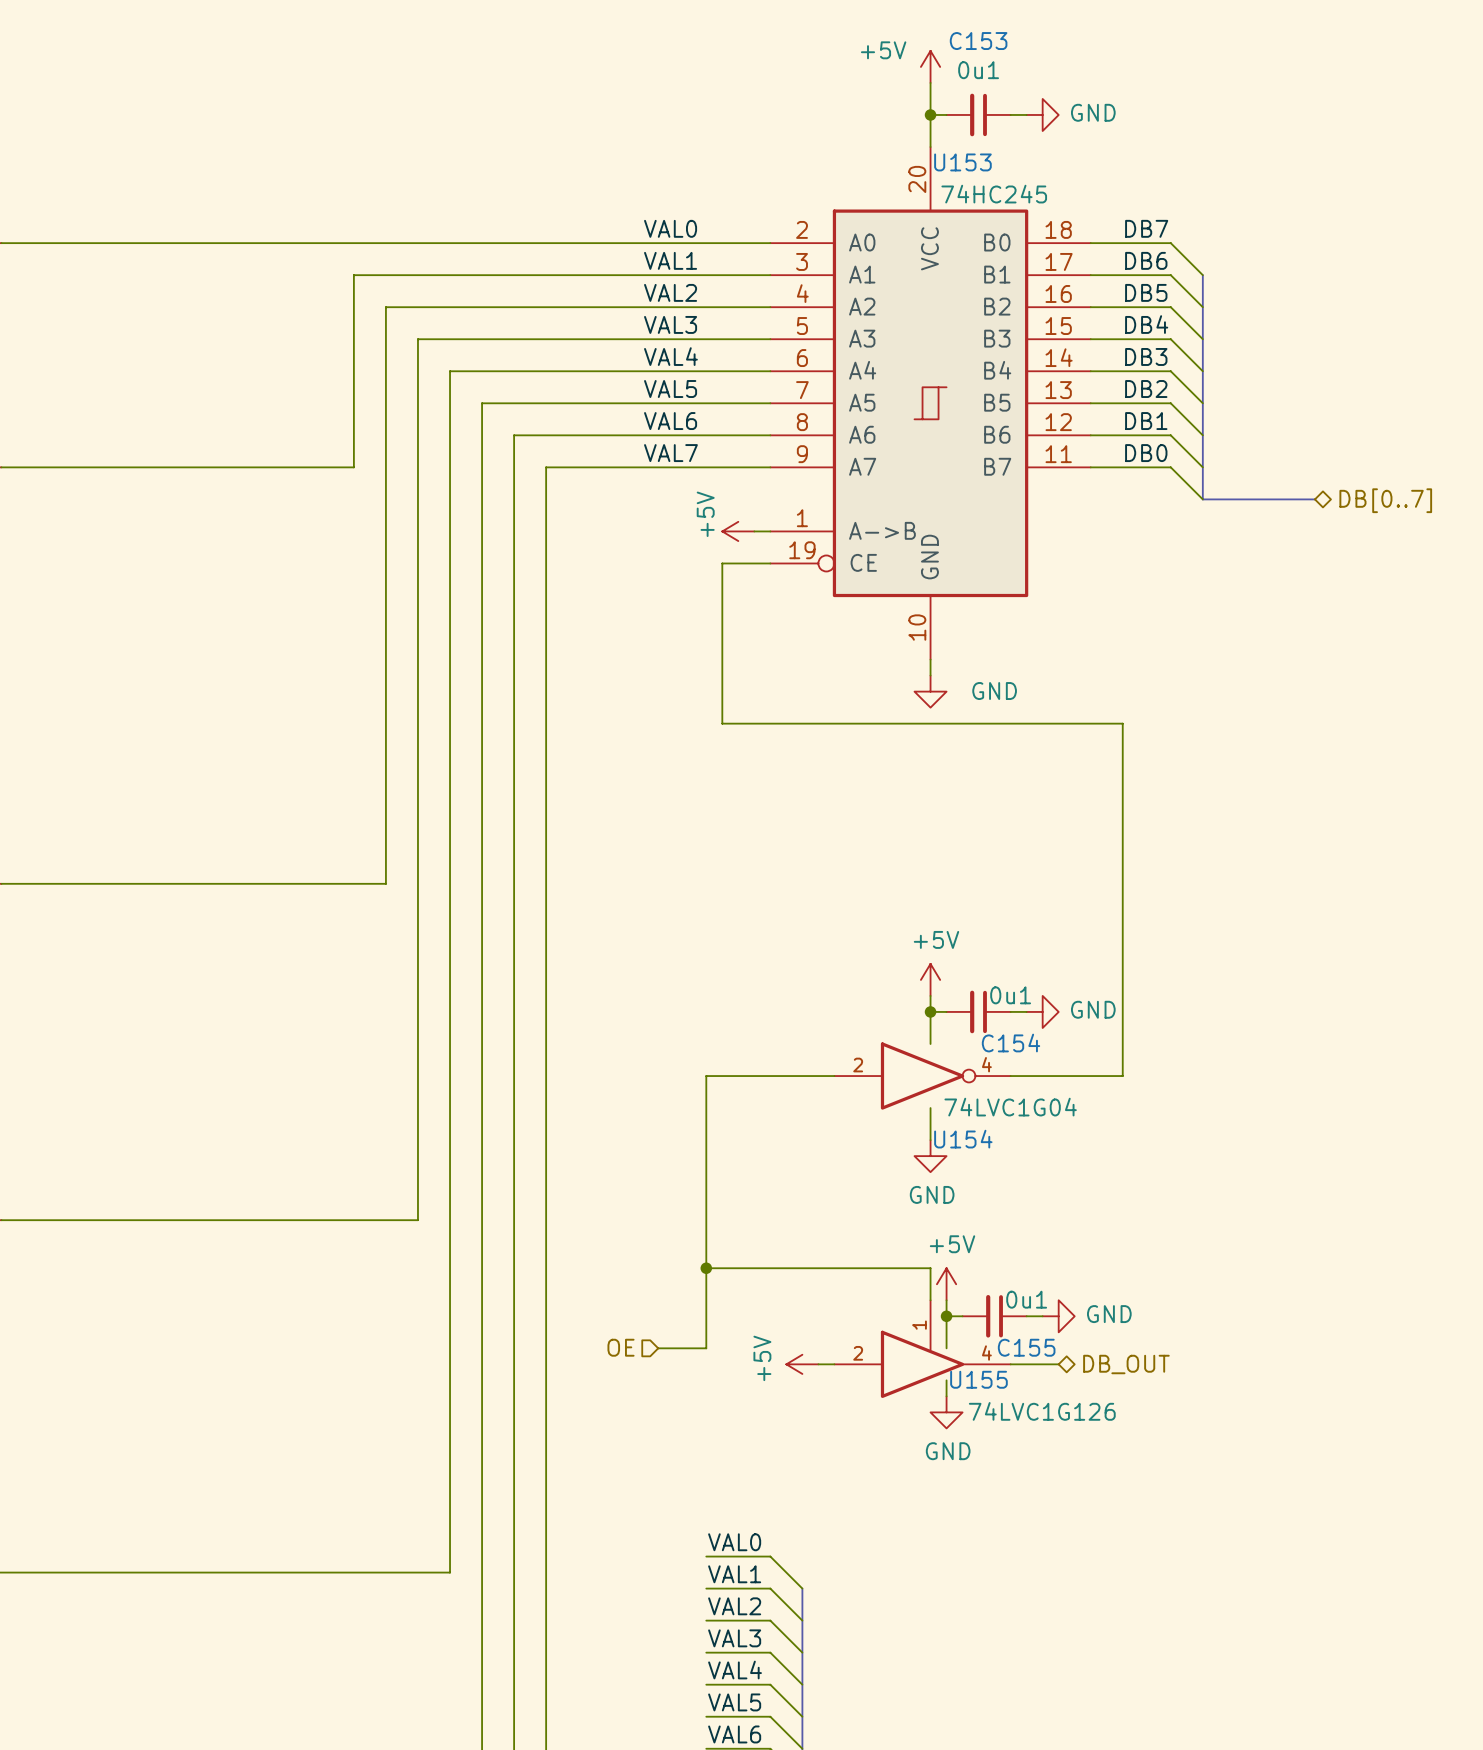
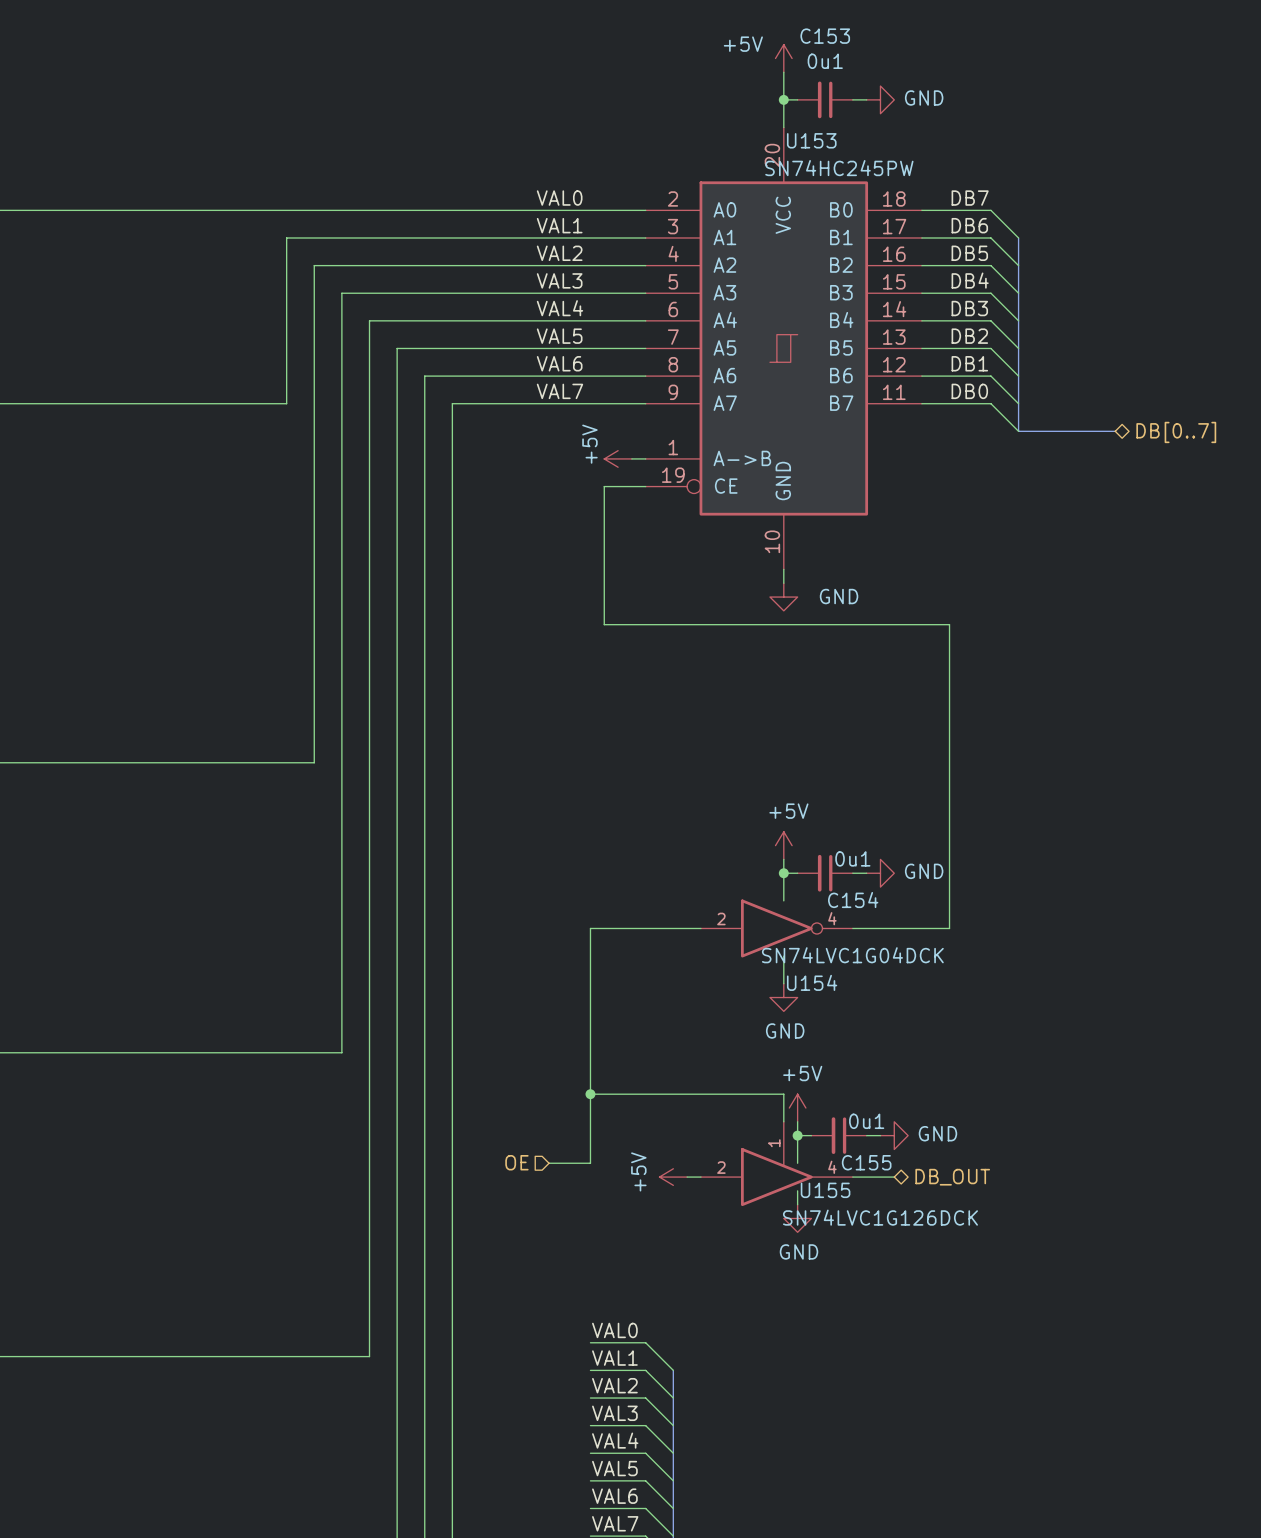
U153 value: 74HC245 (994, 194) -> SN74HC245PW (839, 168)
U154 value: 74LVC1G04 (1010, 1107) -> SN74LVC1G04DCK (852, 955)
U155 value: 74LVC1G126 (1042, 1411) -> SN74LVC1G126DCK (880, 1217)

